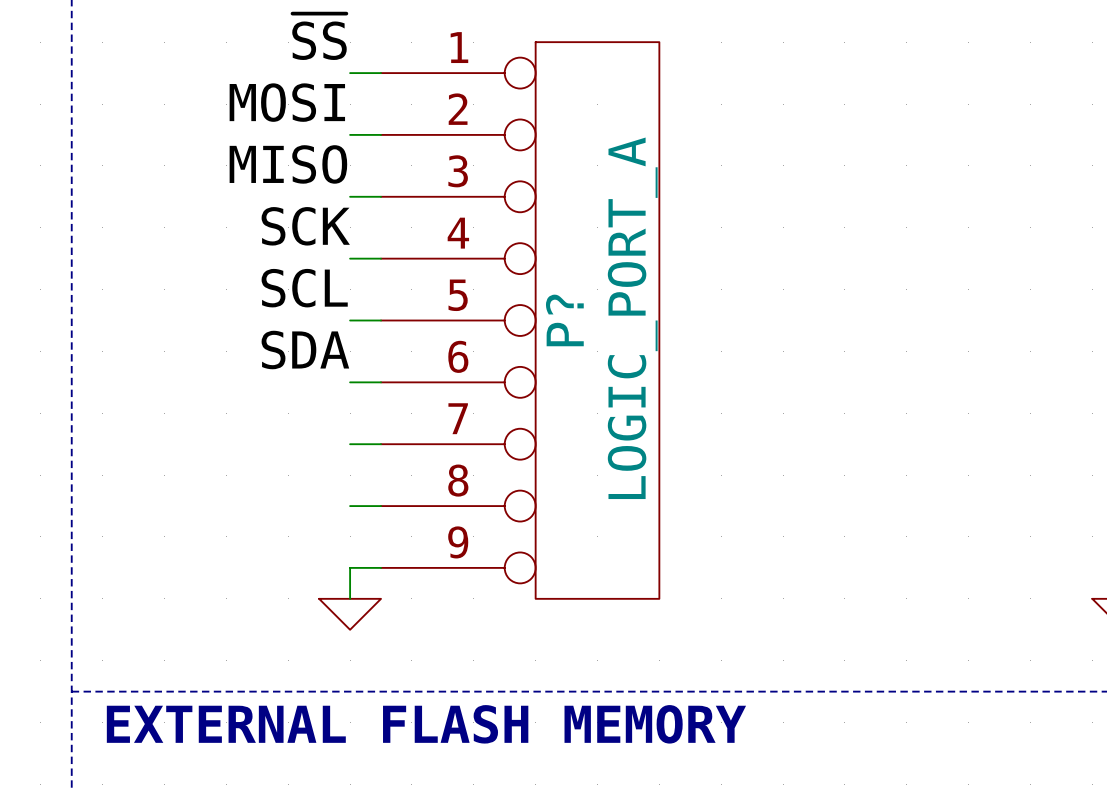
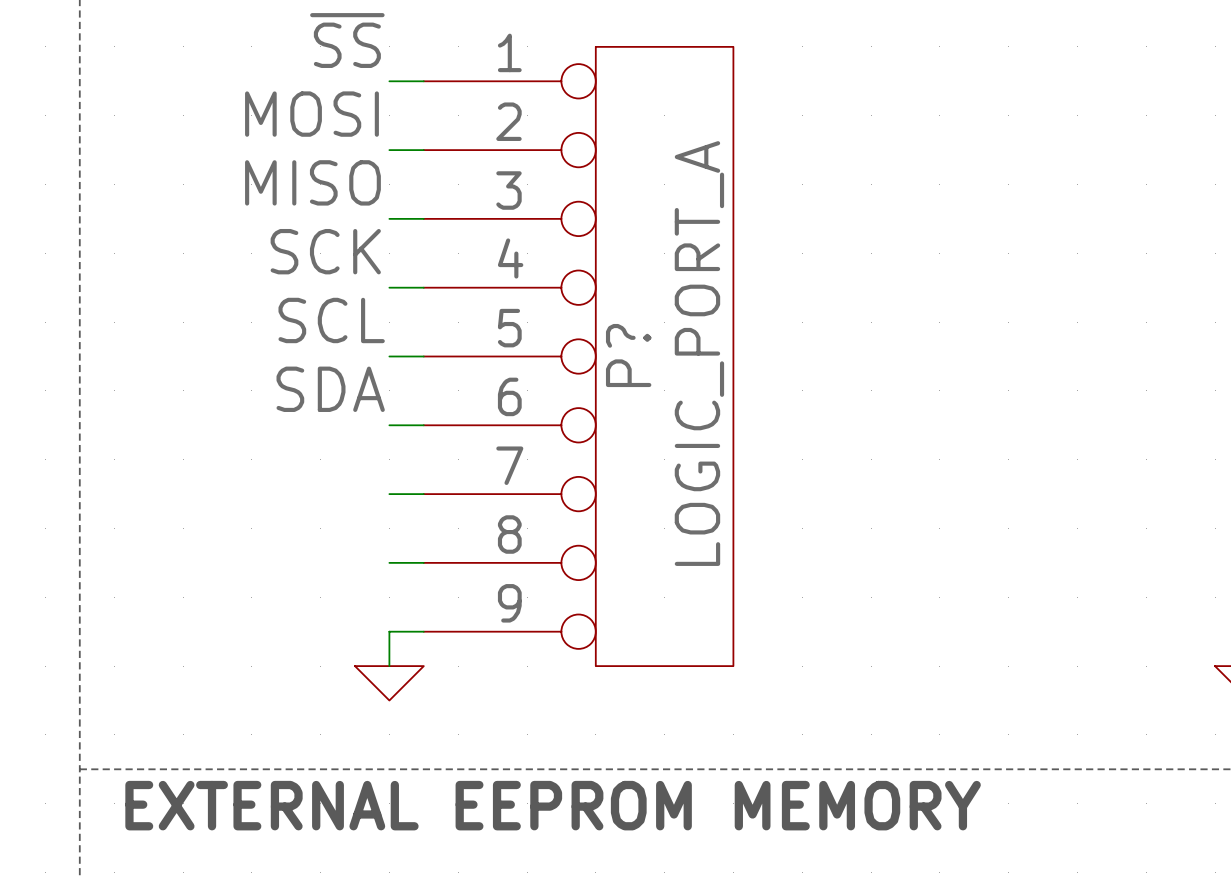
text: EXTERNAL FLASH MEMORY (426, 724) -> EXTERNAL EEPROM MEMORY (553, 805)

